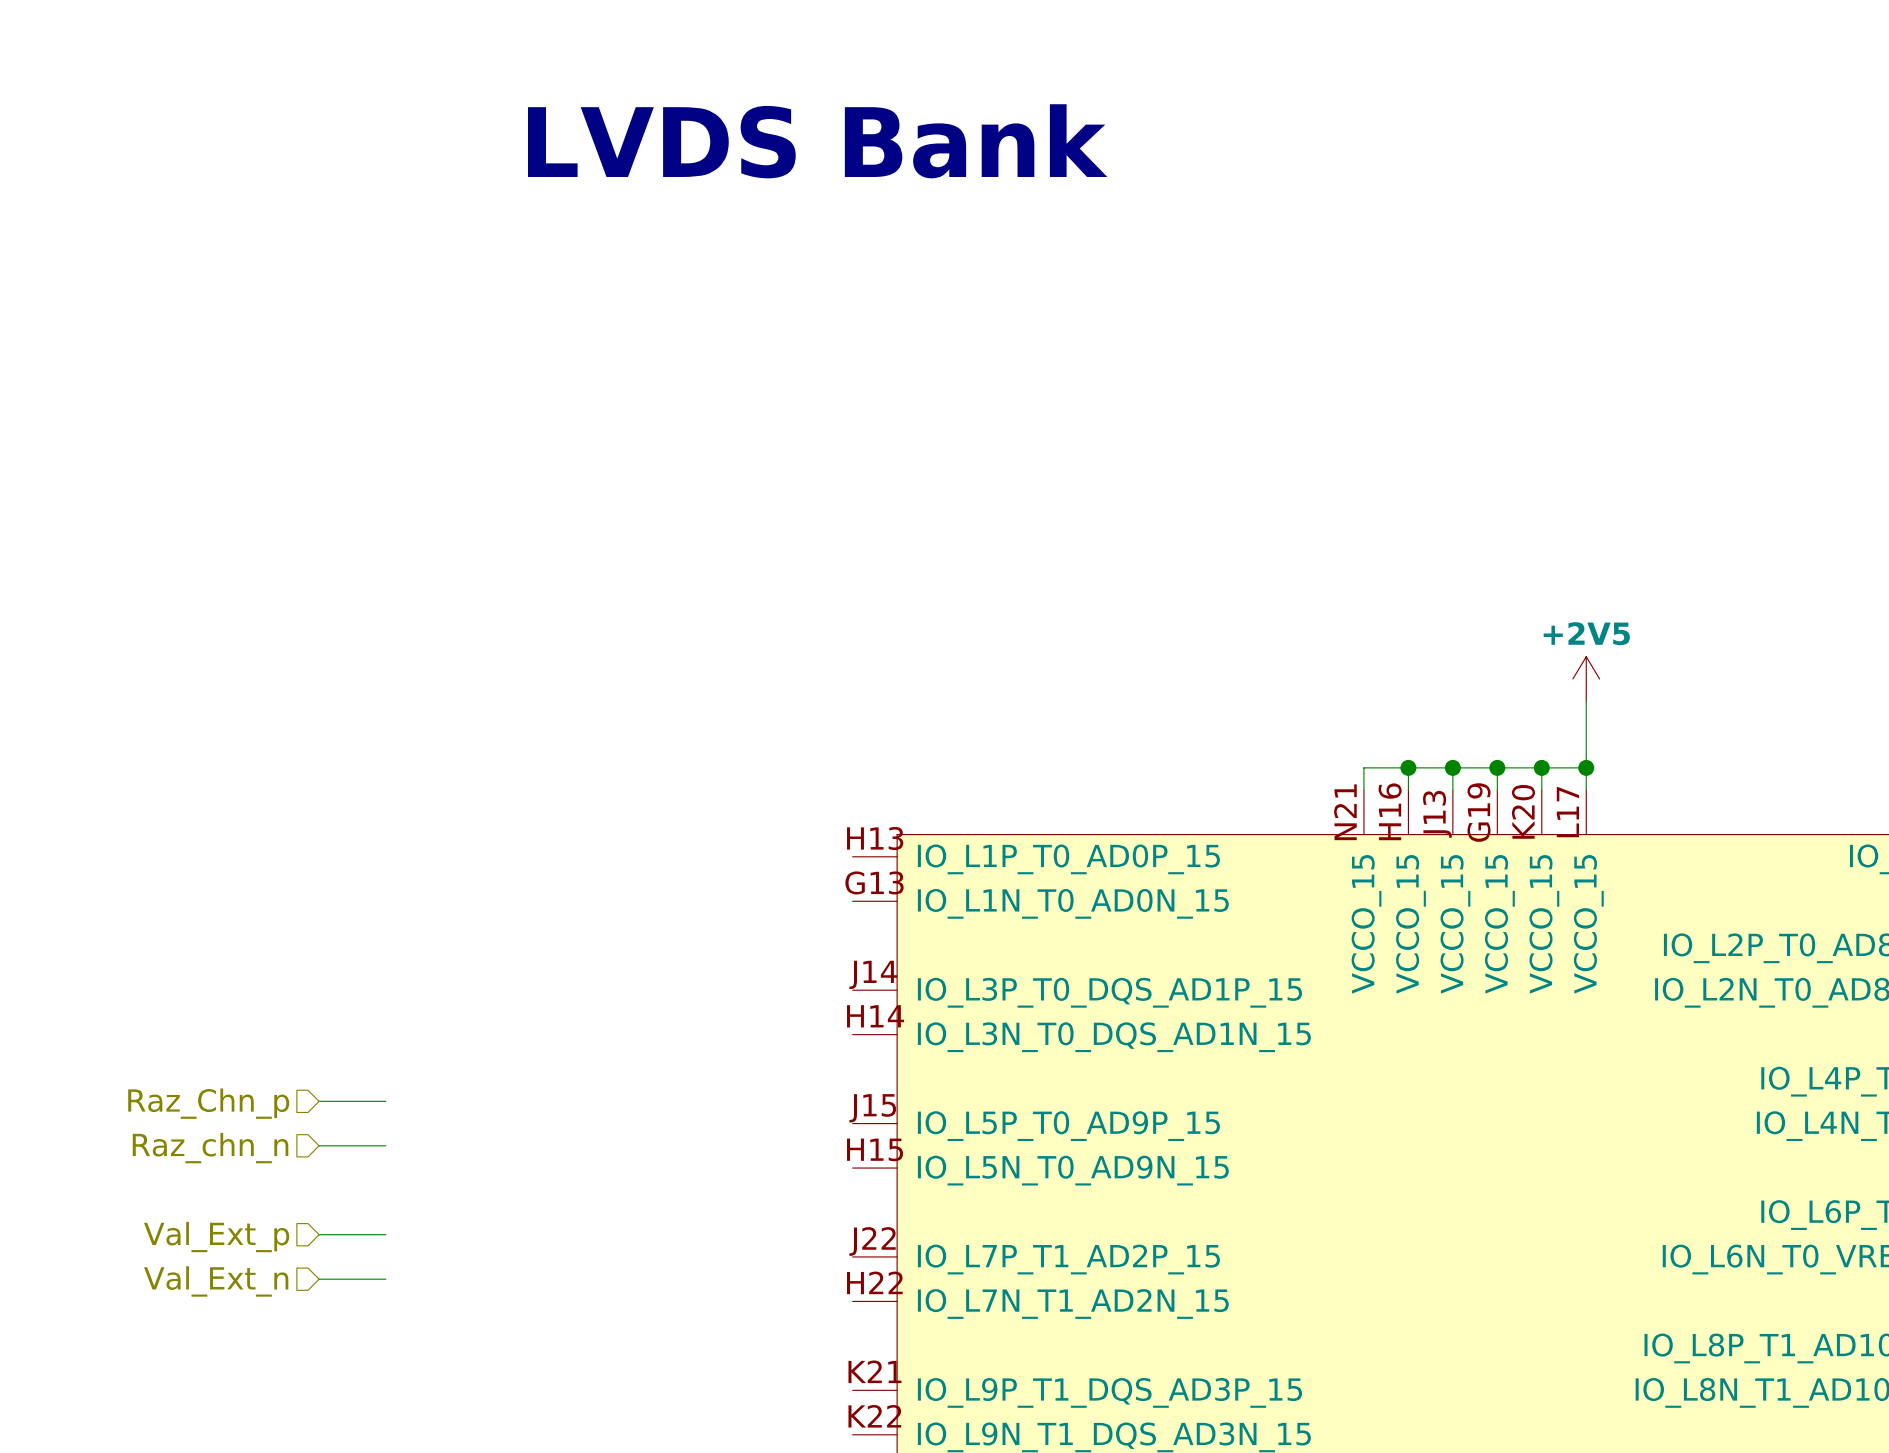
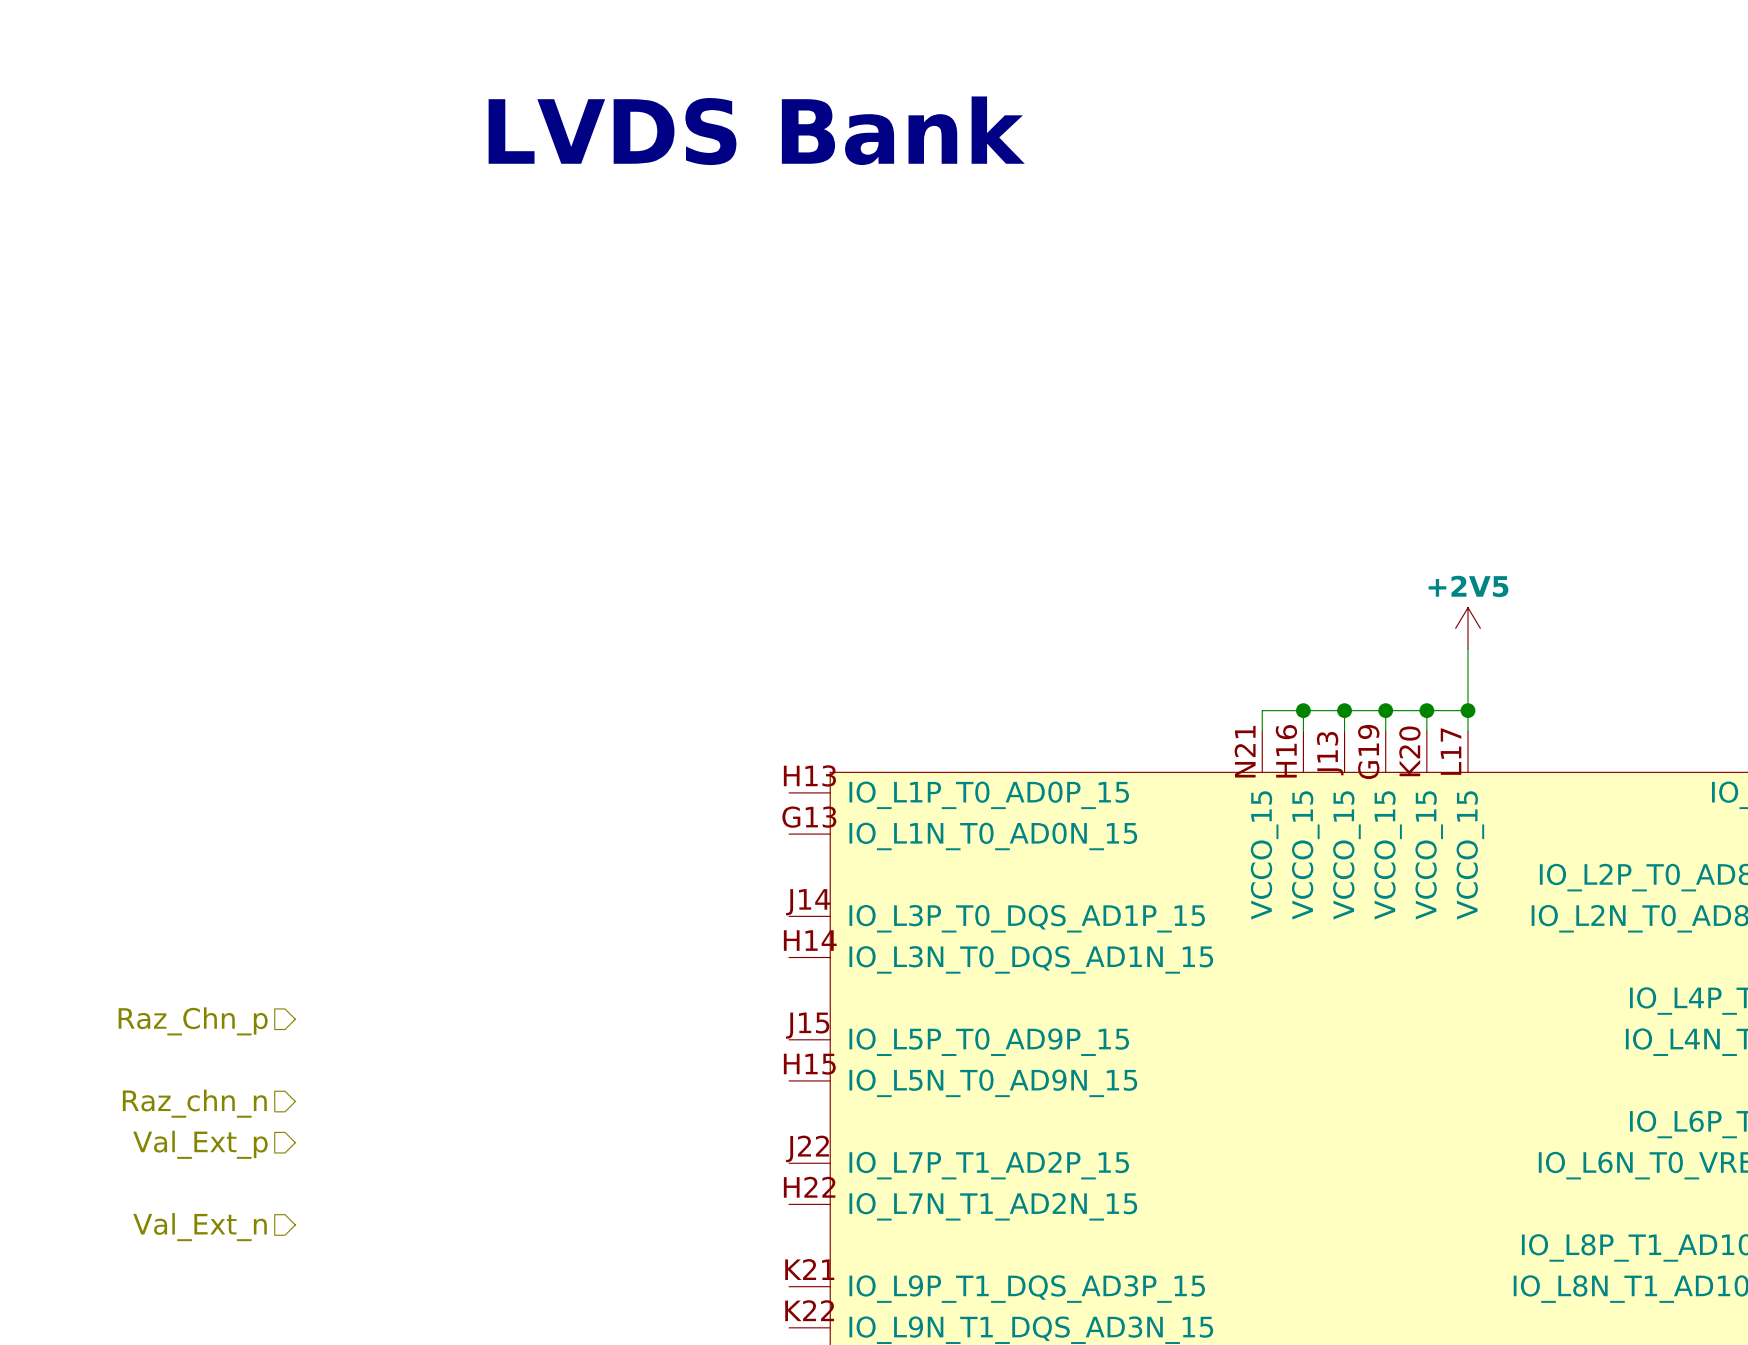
wire: (319, 1101) (385, 1101) -> none
wire: (319, 1145) (385, 1145) -> none
hierarchical label position: Raz_chn_n (210, 1148) -> Raz_chn_n (194, 1103)
wire: (319, 1234) (385, 1234) -> none
wire: (319, 1279) (385, 1279) -> none
hierarchical label position: Val_Ext_n (216, 1281) -> Val_Ext_n (200, 1227)

